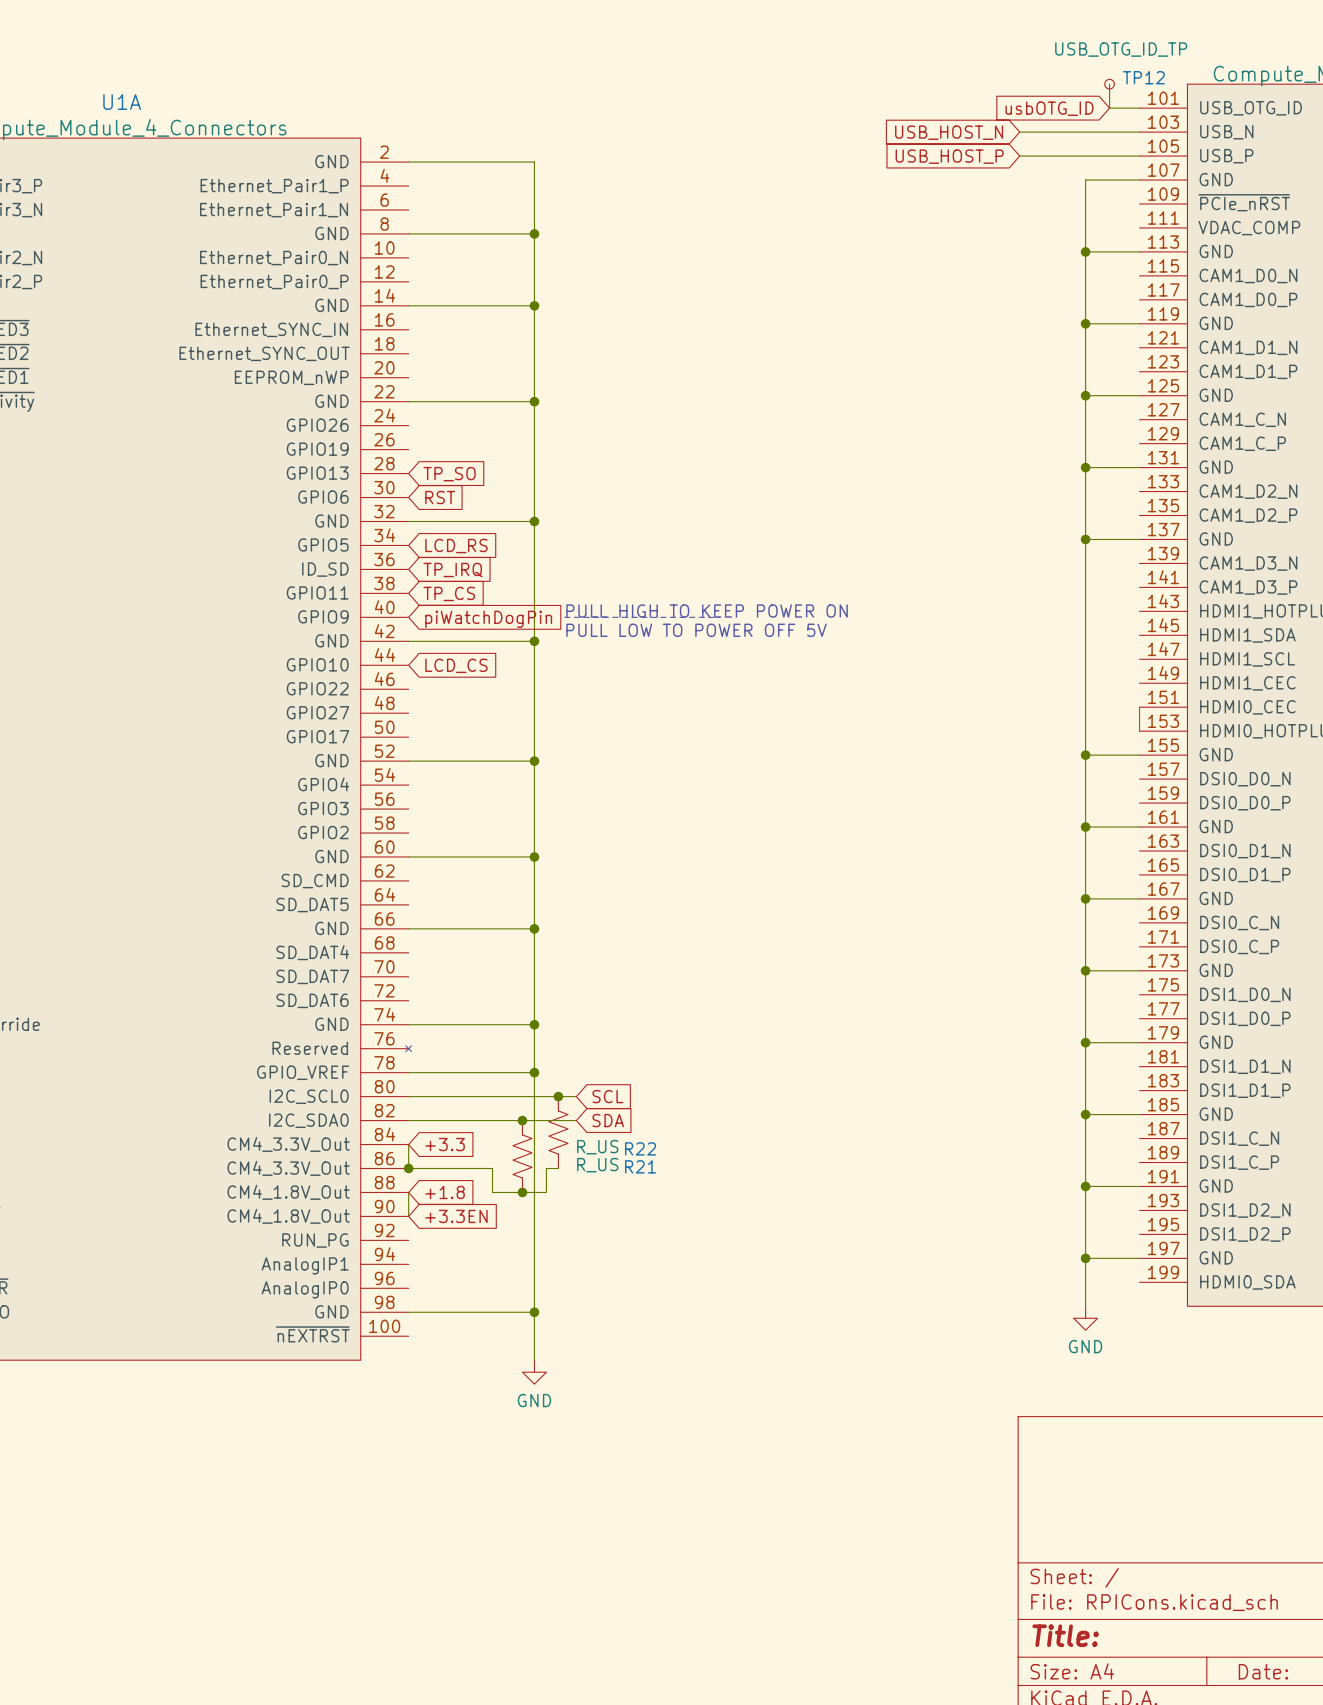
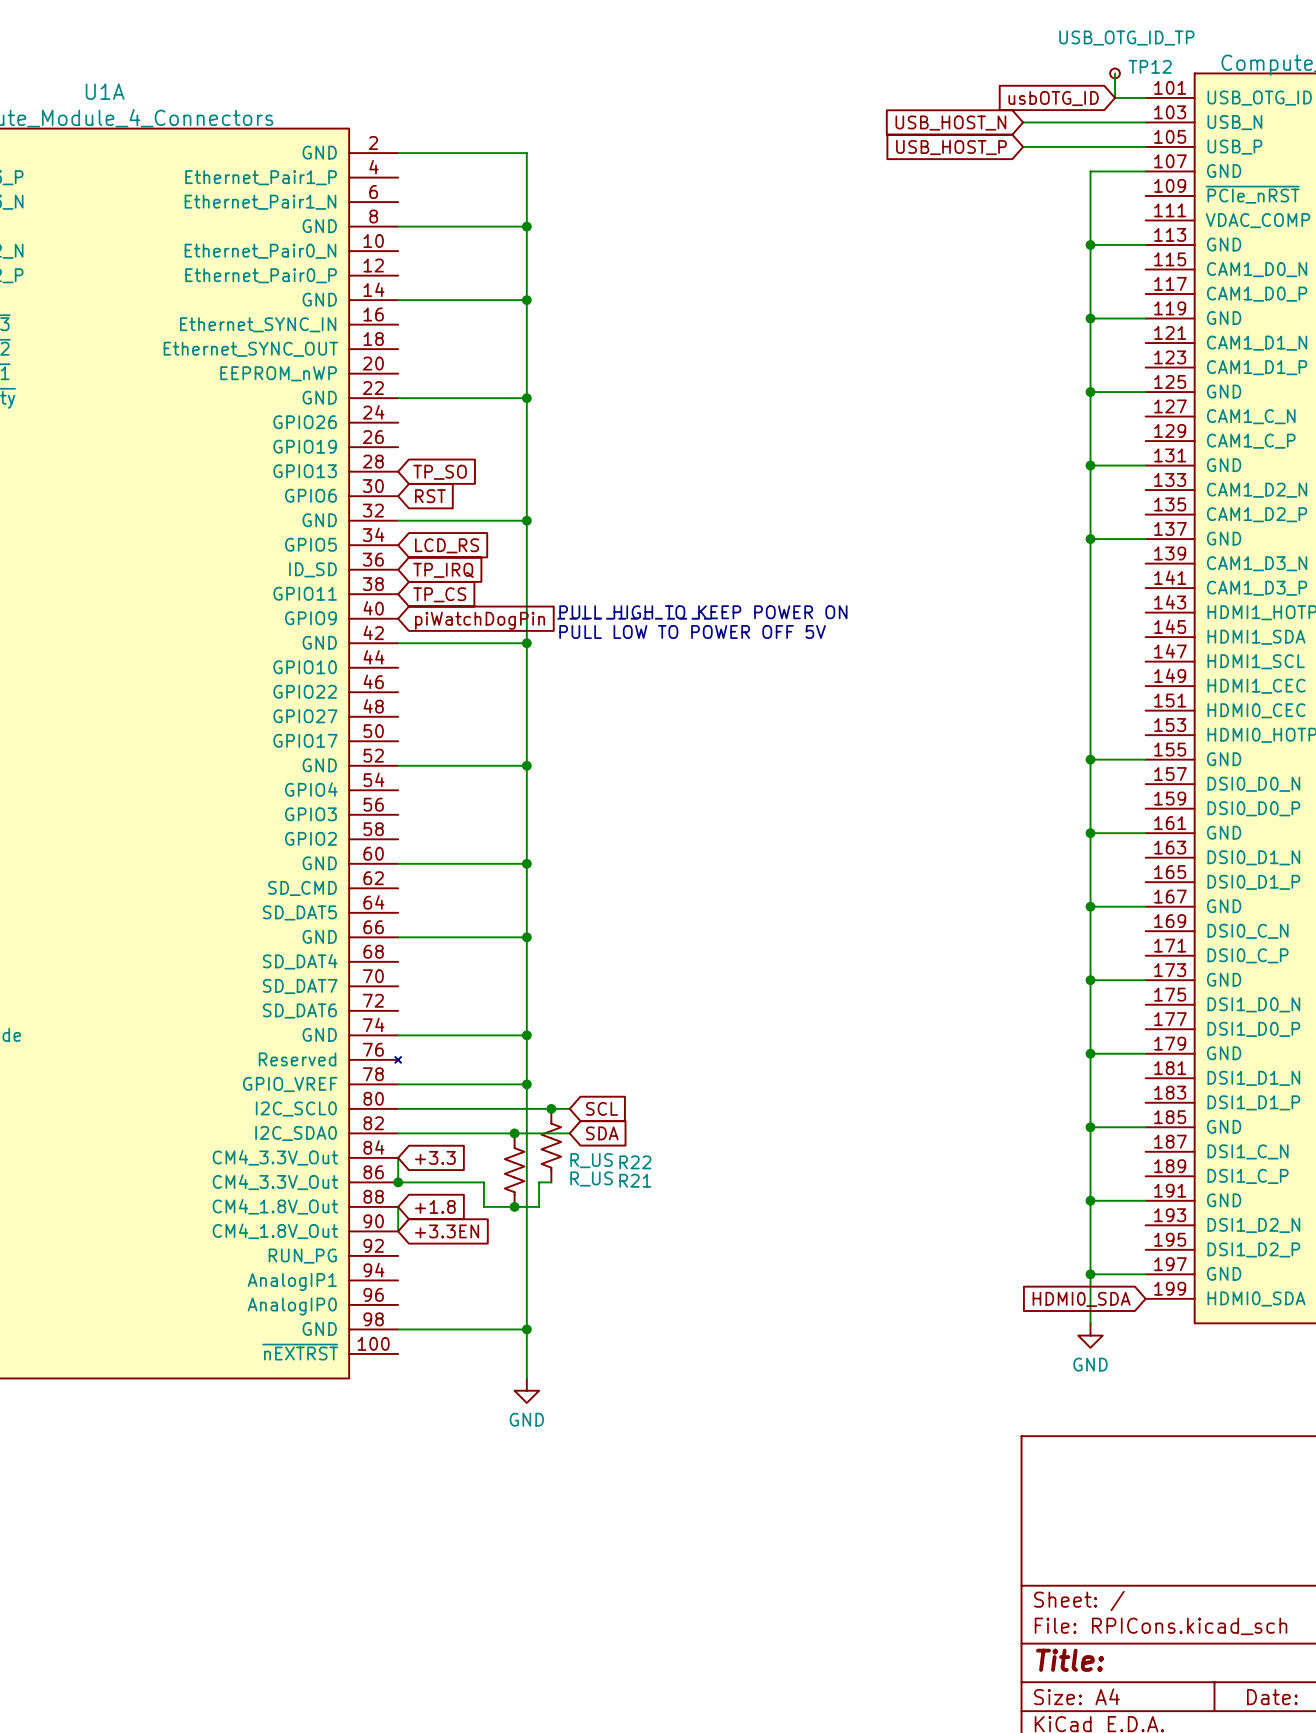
global label: LCD_CS (456, 665) -> none
wire: (1139, 707) (1139, 731) -> none
global label: none -> HDMI0_SDA (1081, 1299)

